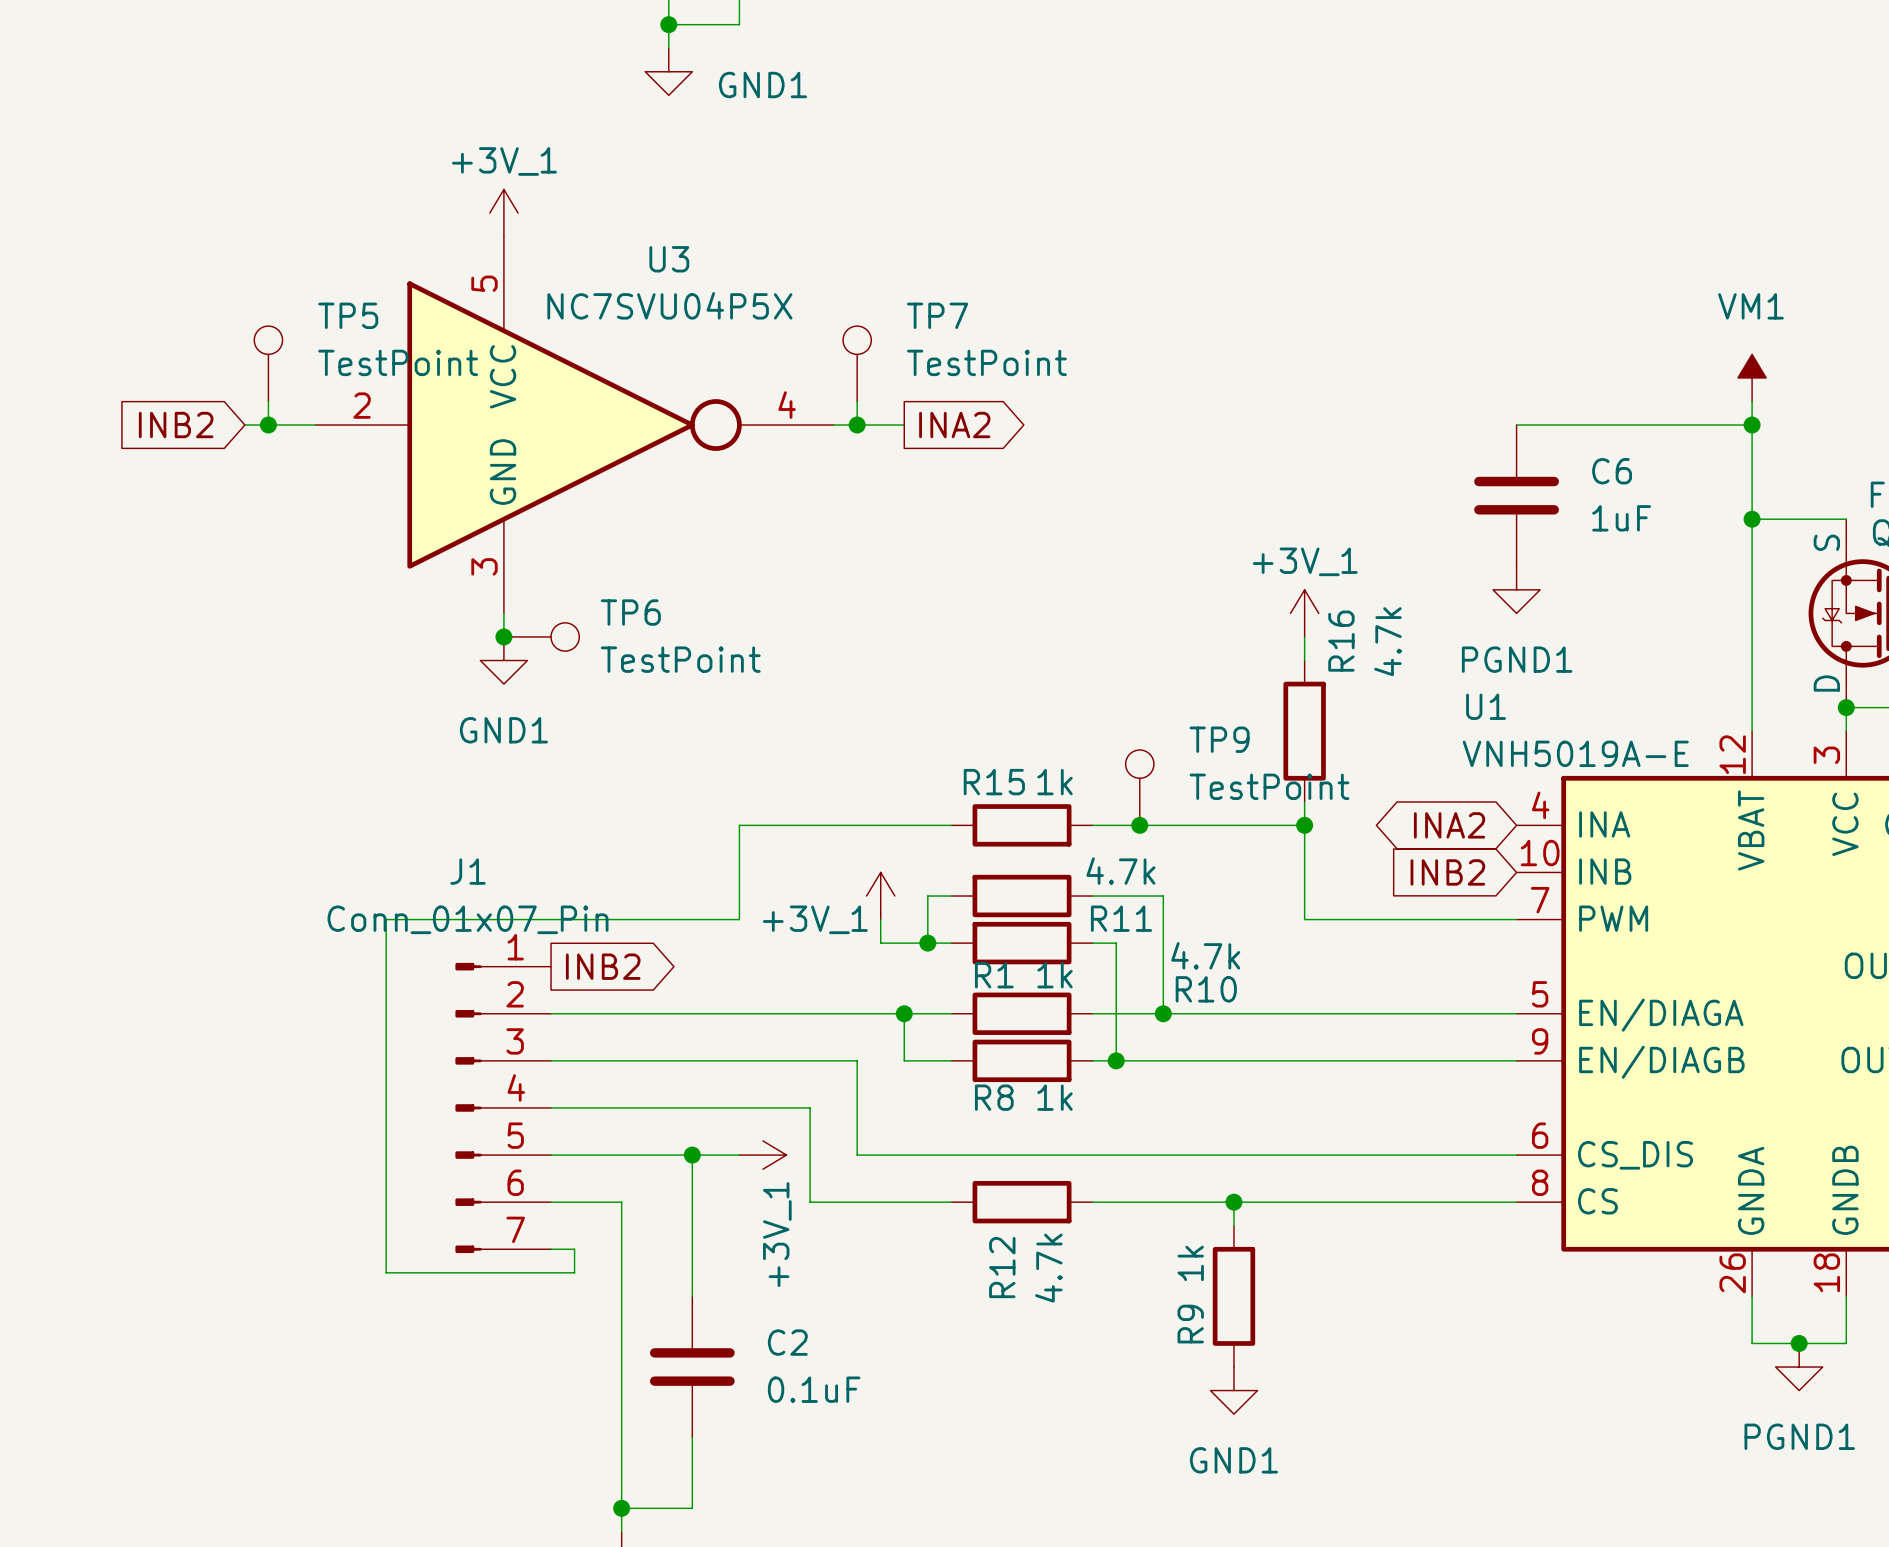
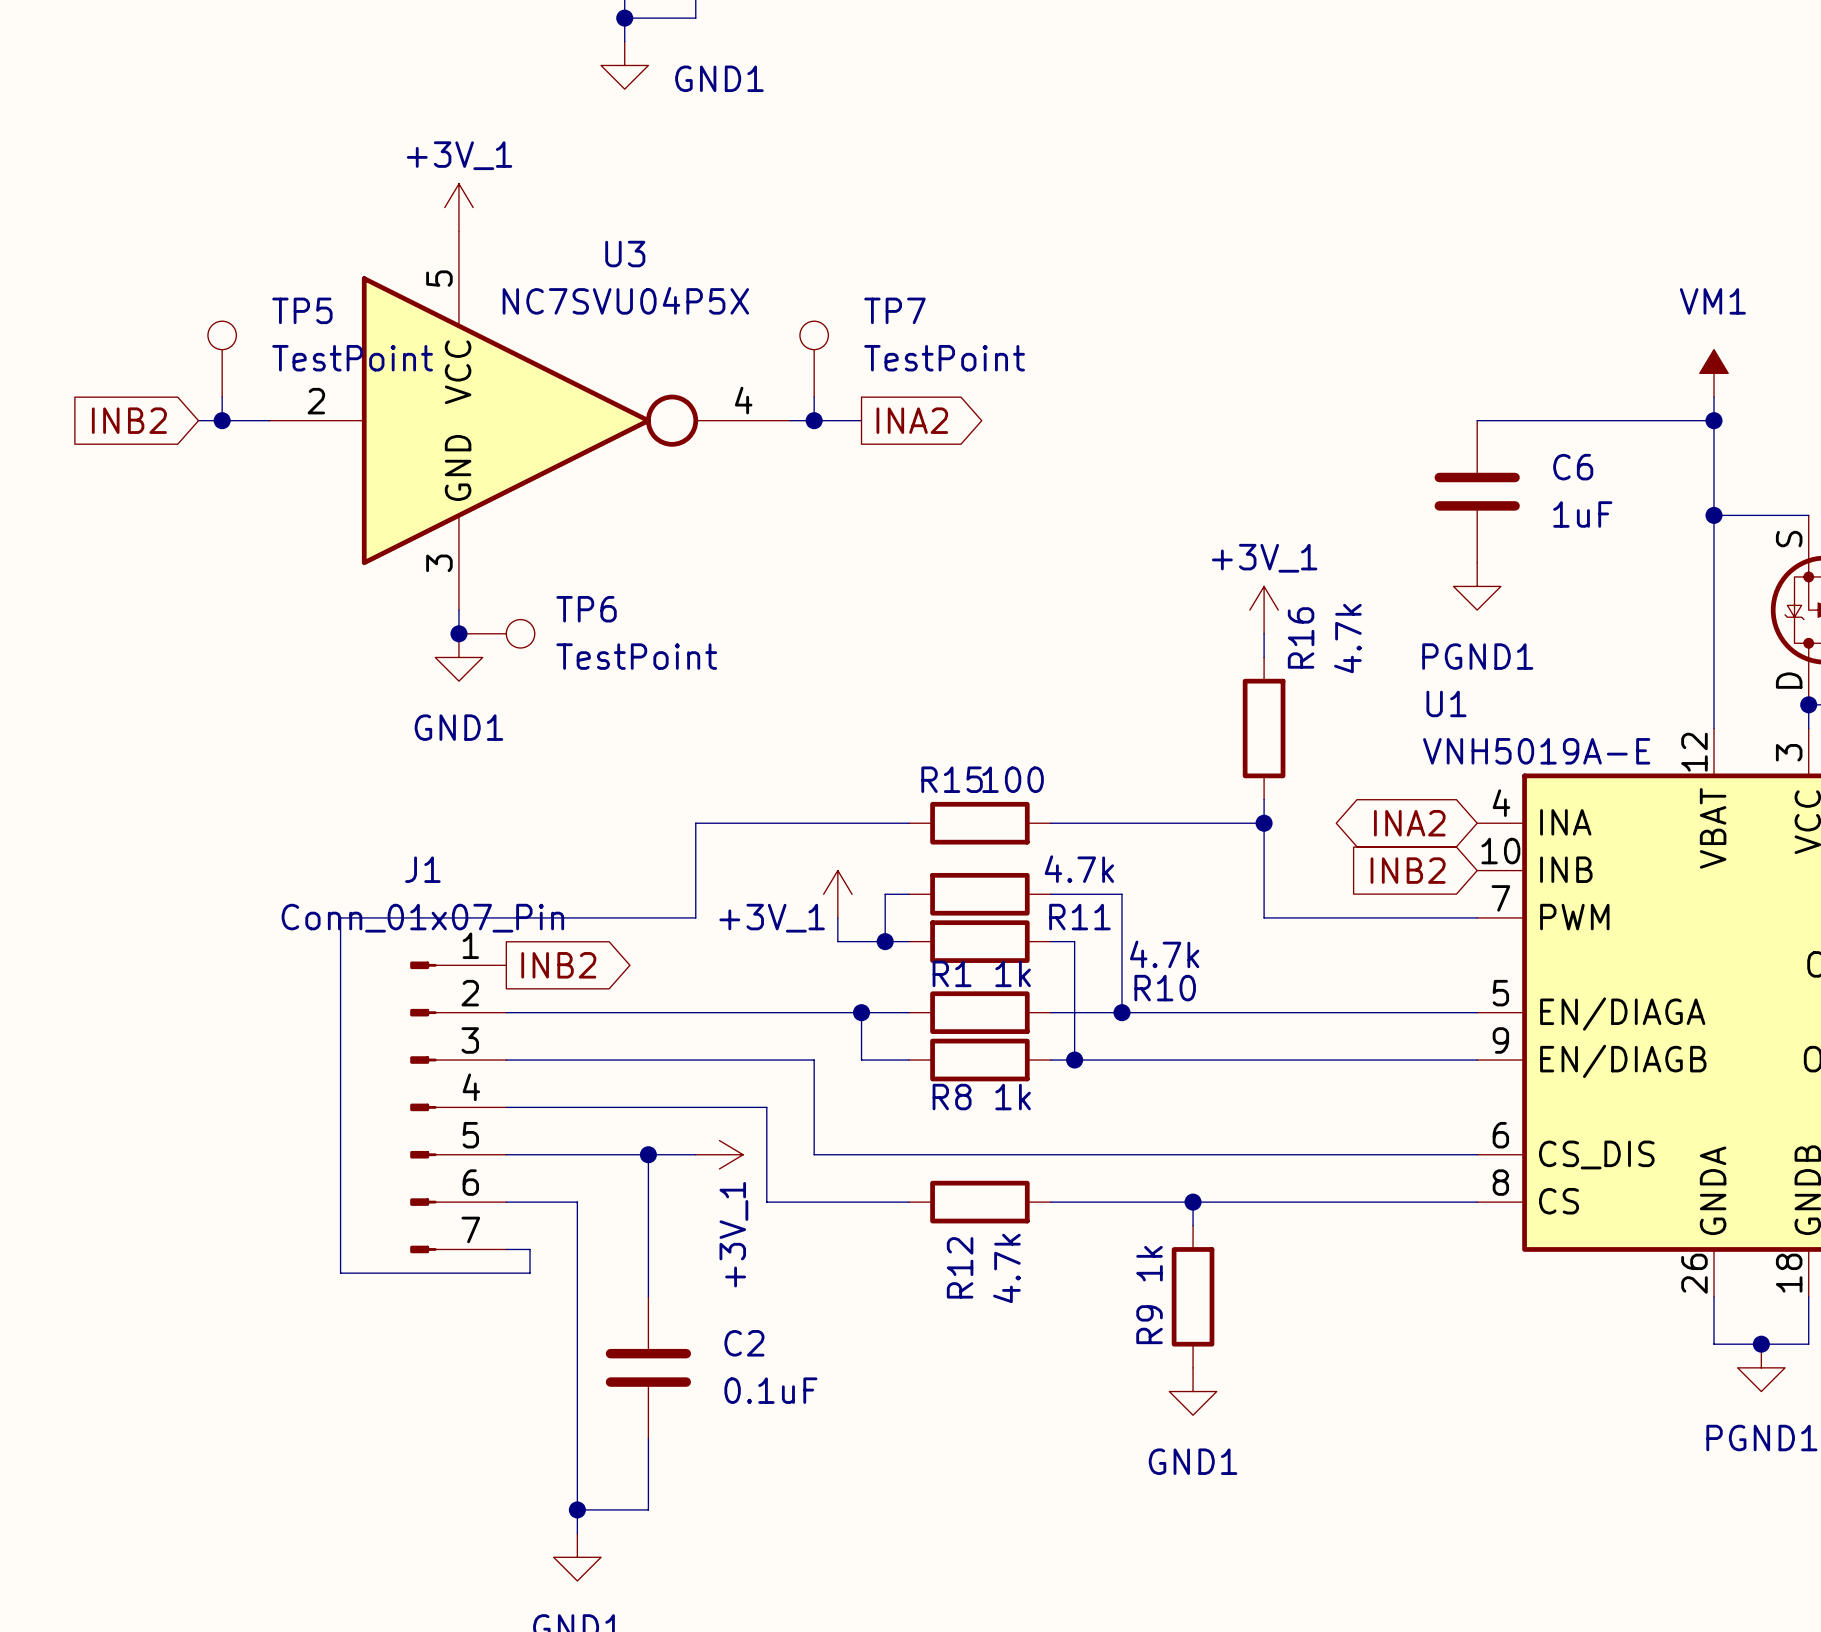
R15 value: 1k (1054, 782) -> 100 (1013, 779)
TP9: TestPoint (1139, 787) -> none
junction: (1139, 825) -> none

